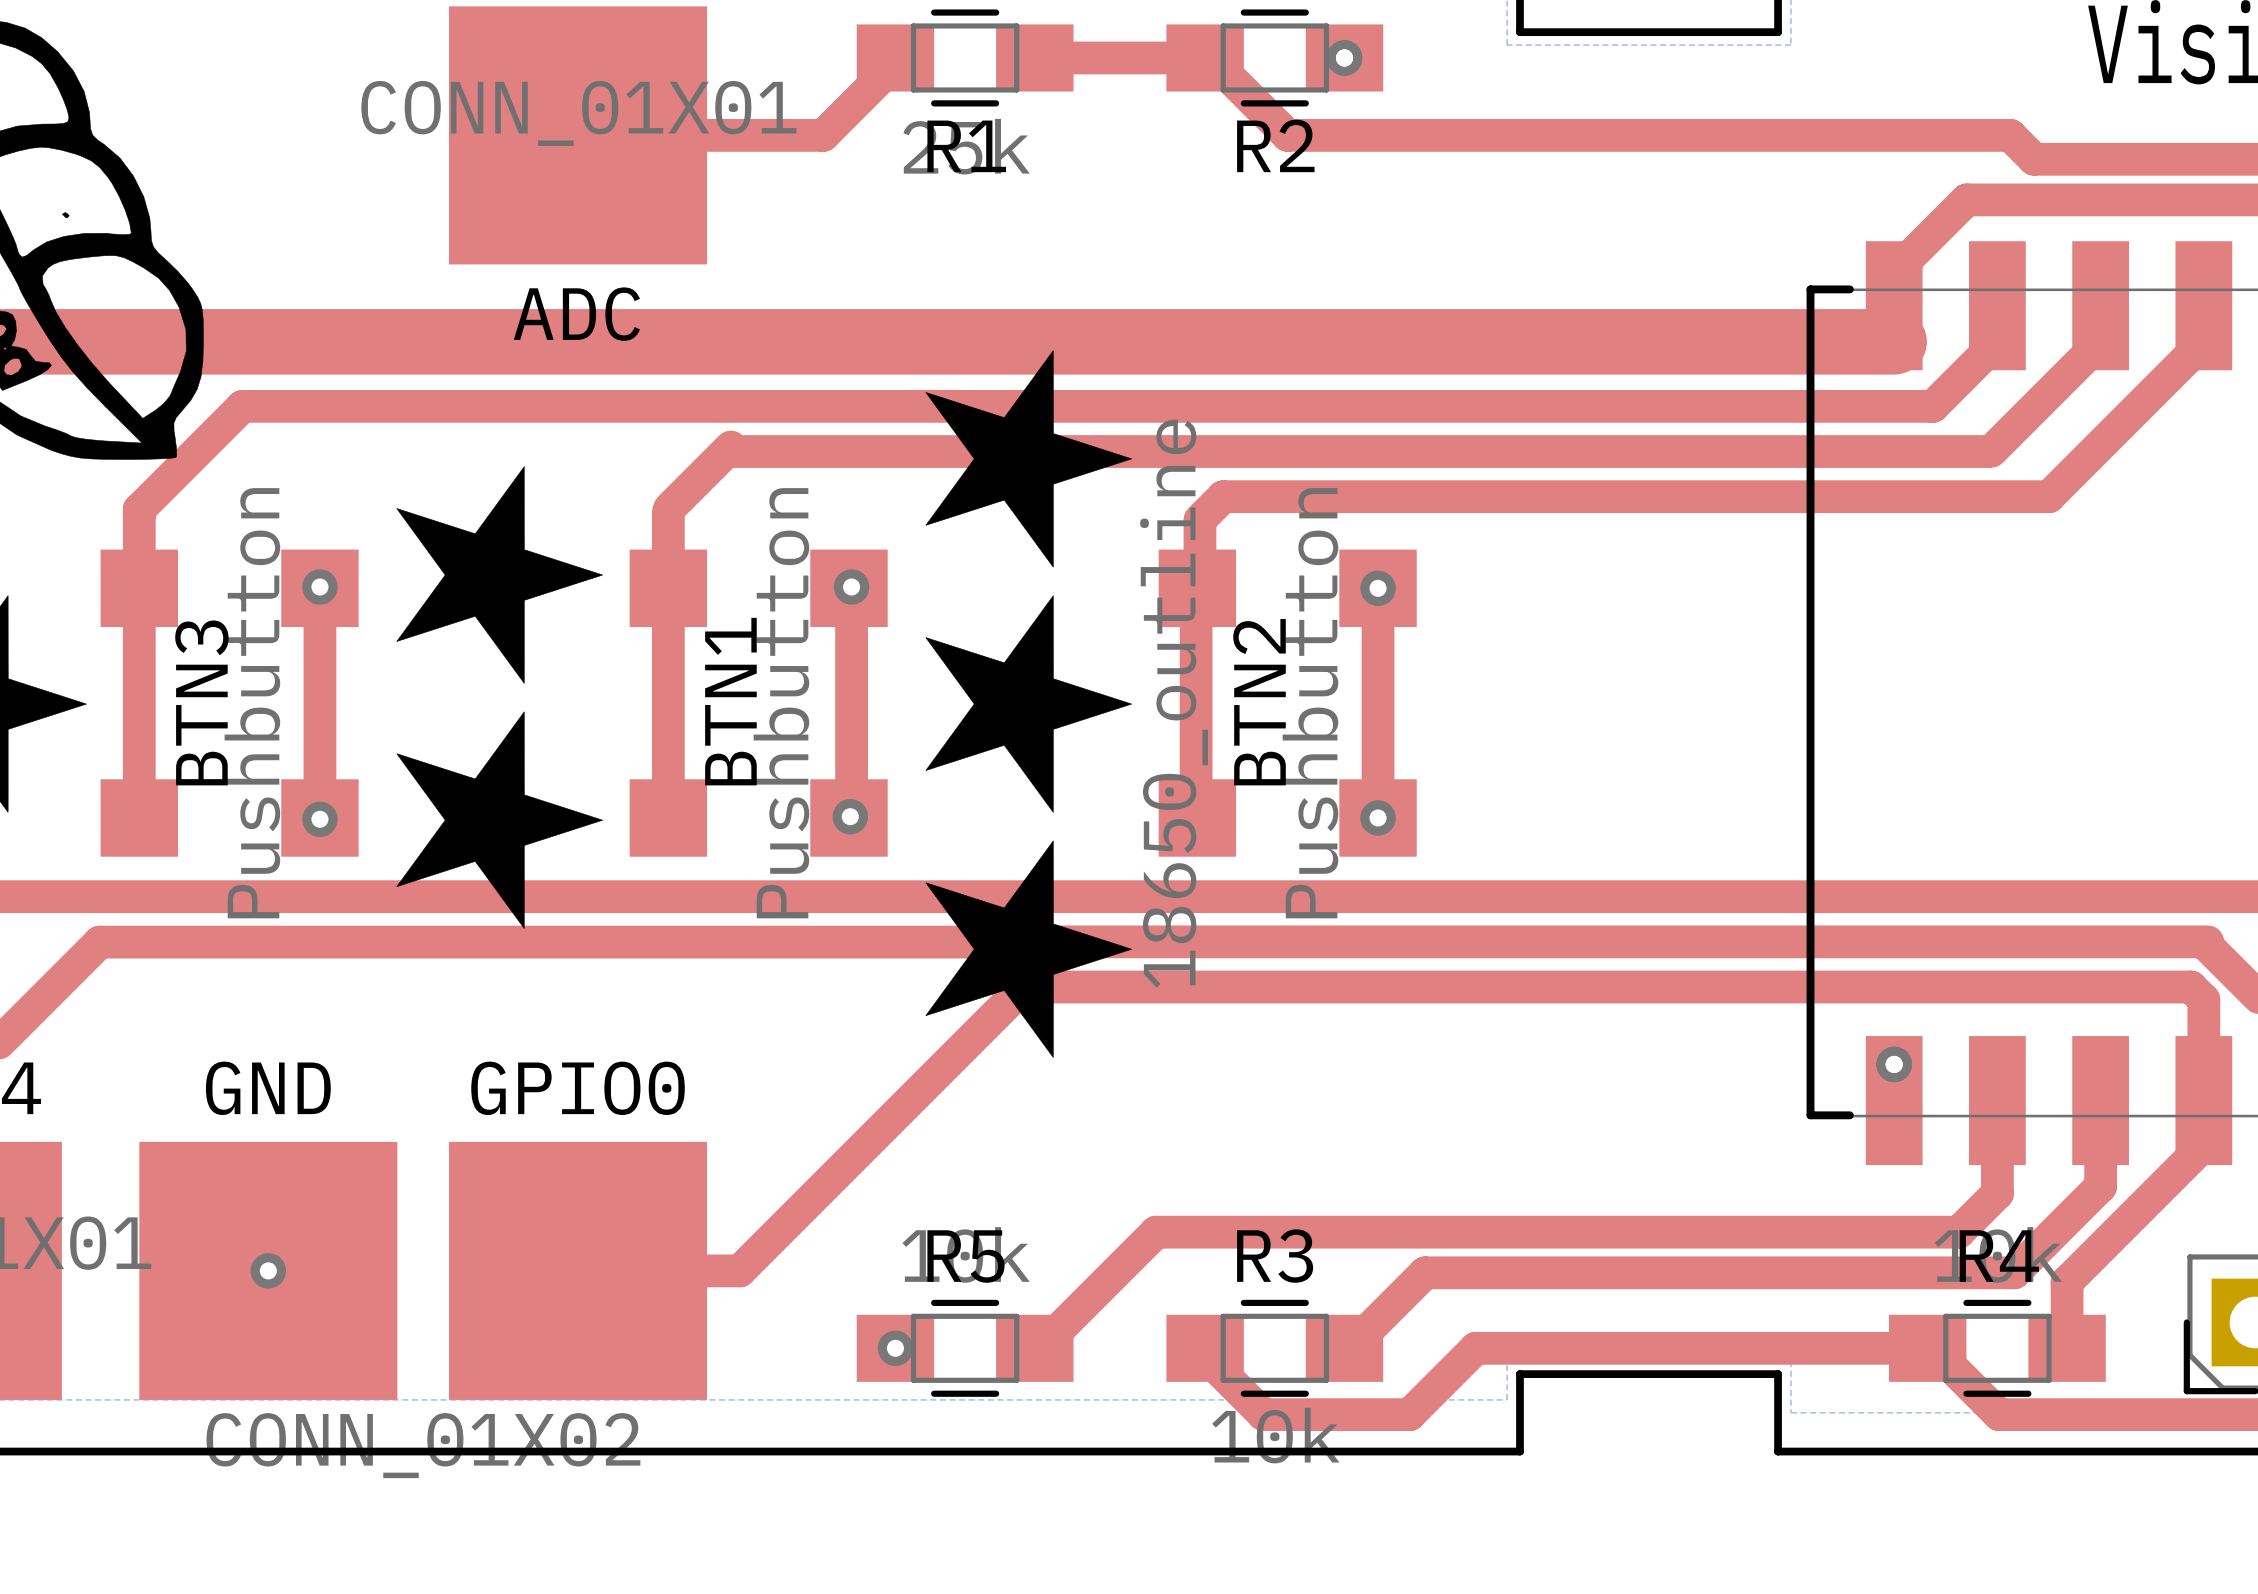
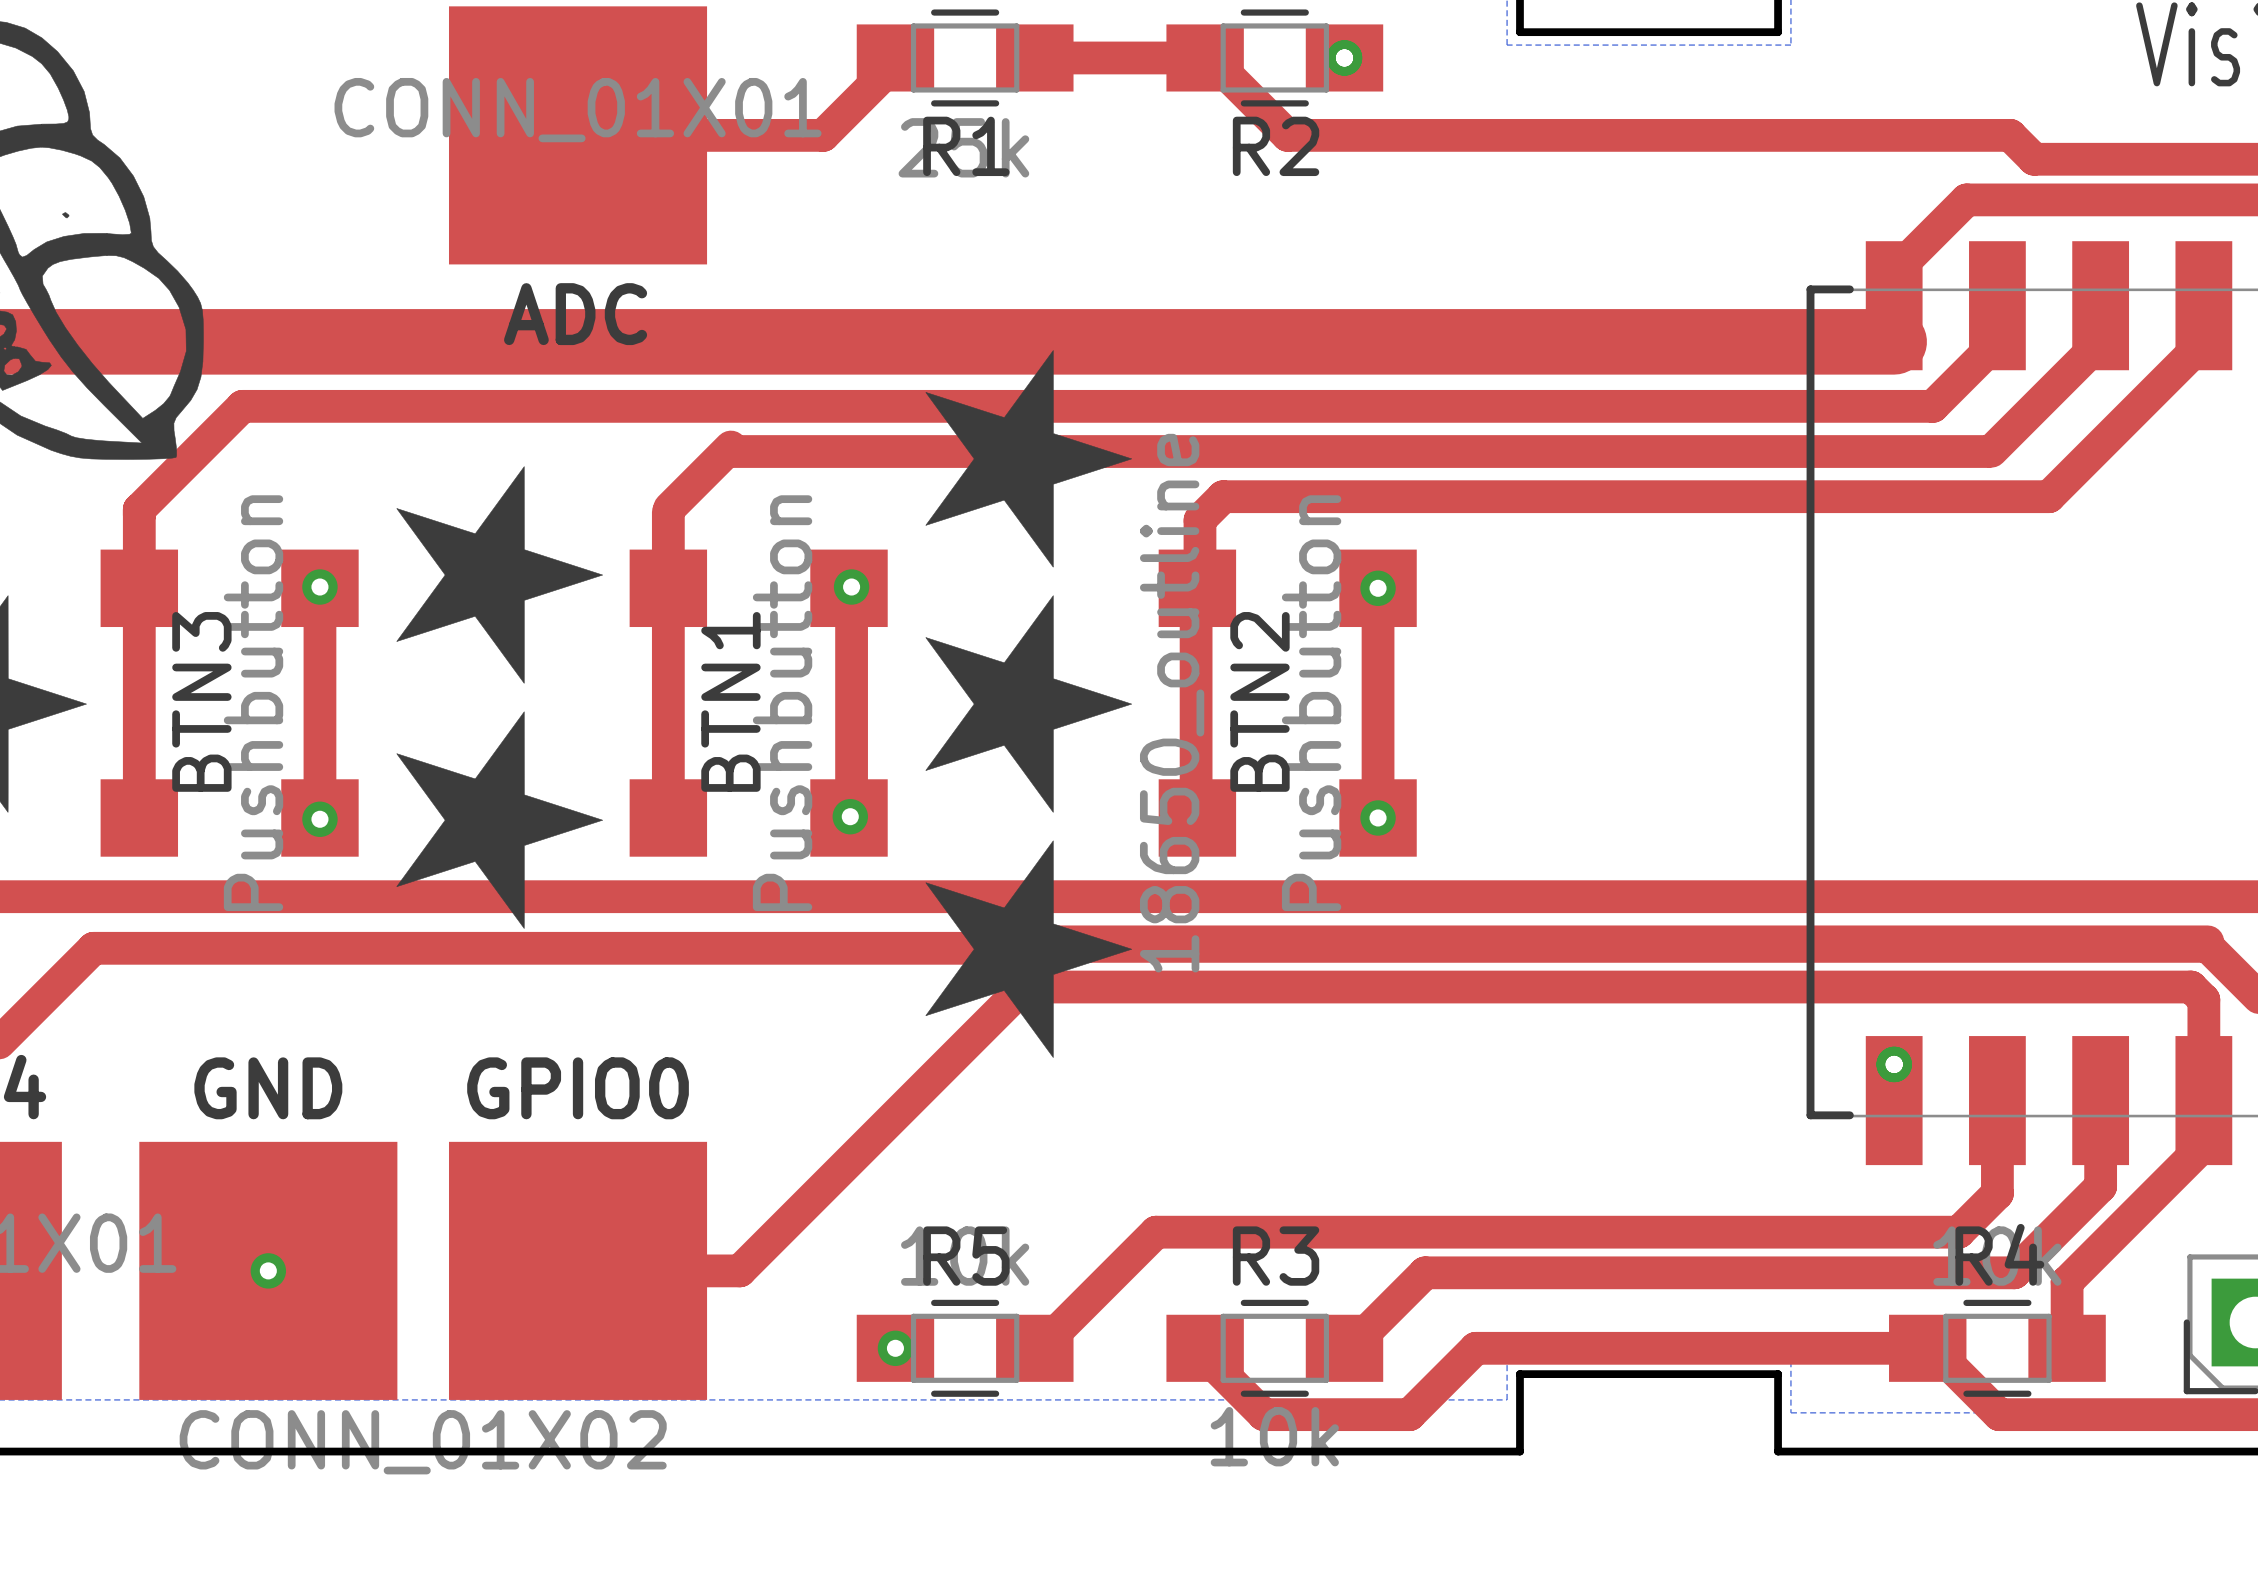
top track: (1002, 942) (99, 942) (93, 948) -> (2207, 946) (93, 948)

